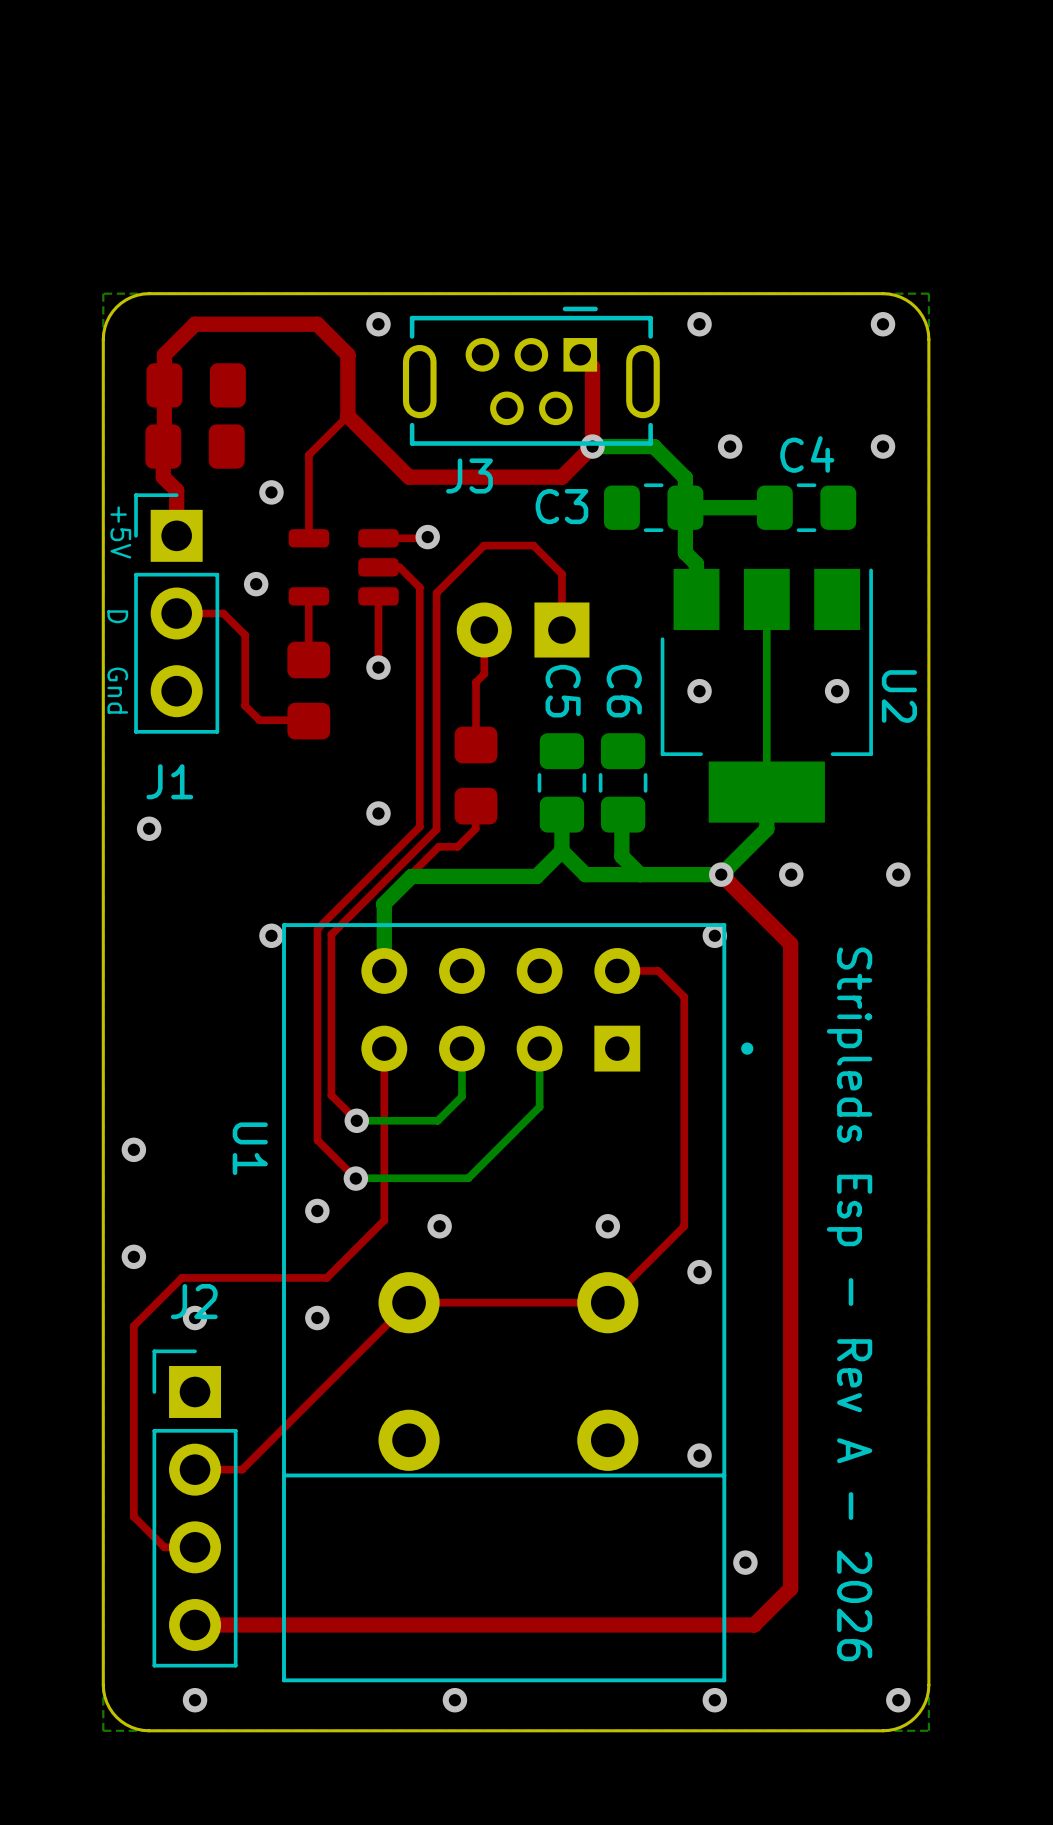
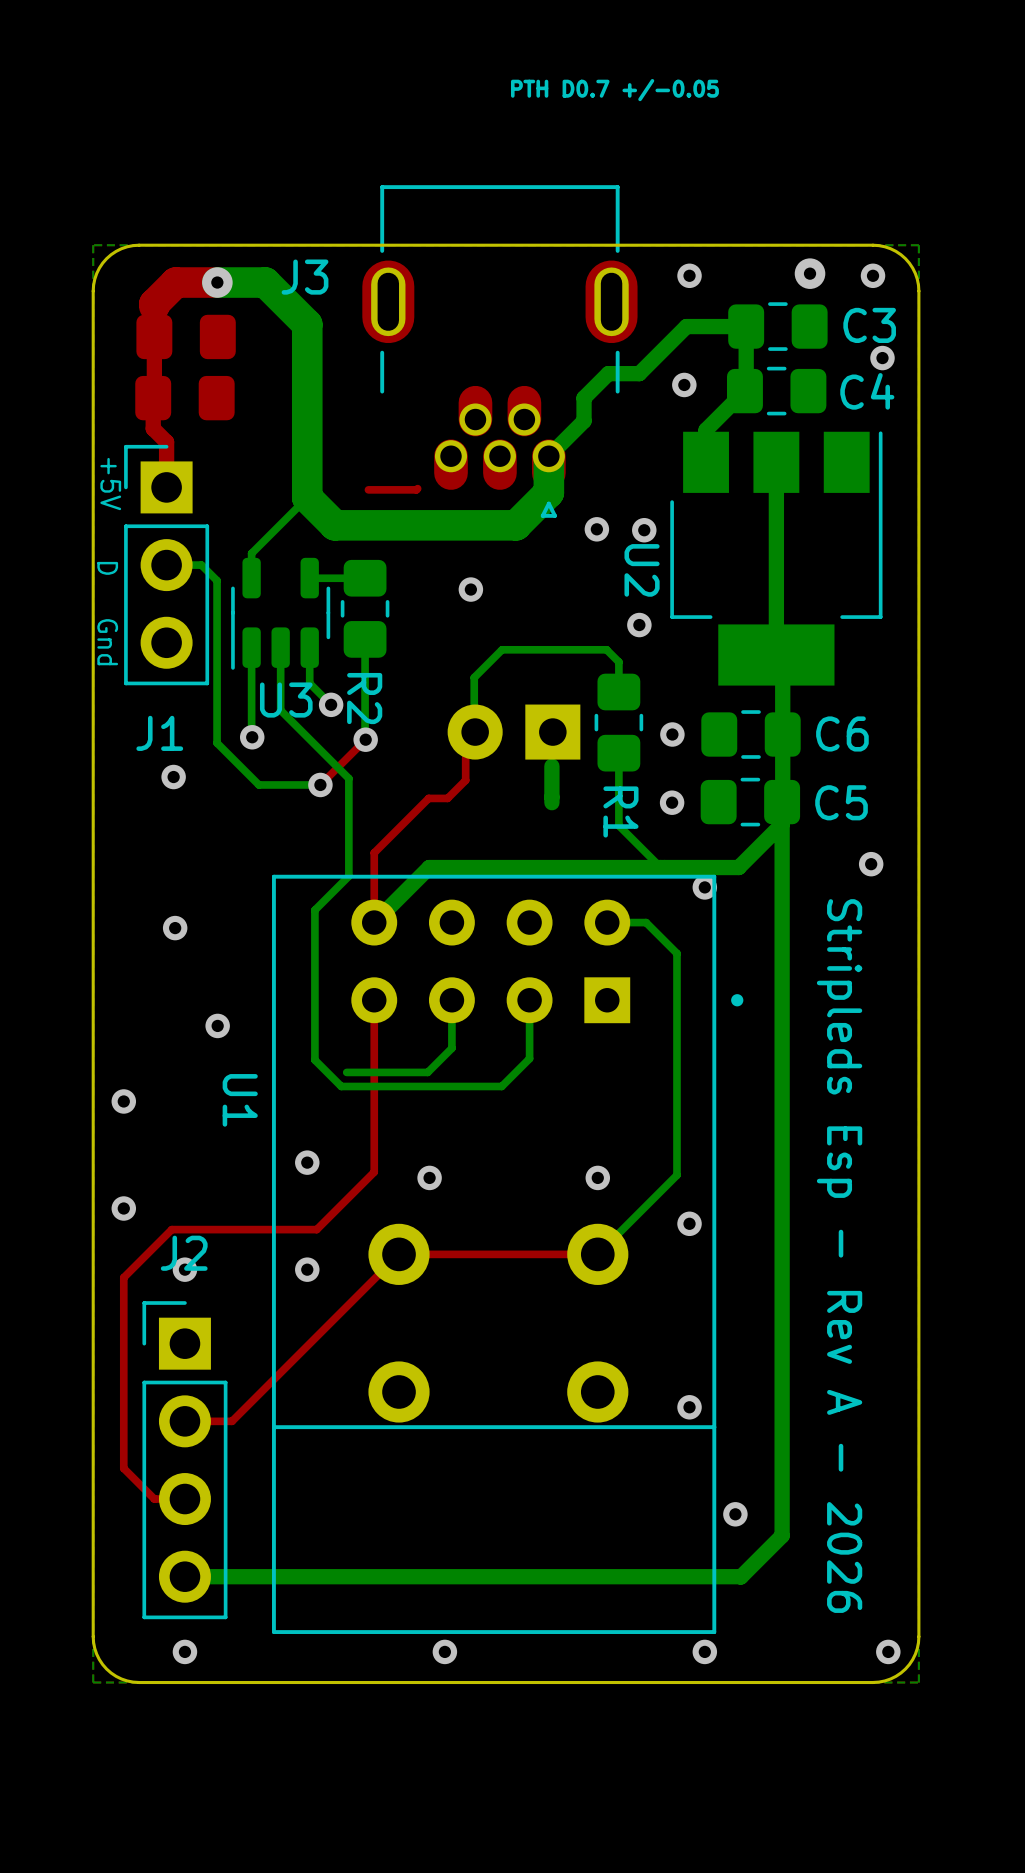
J3 footprint: [402, 306, 660, 446] -> [362, 185, 638, 518]
via: none -> (810, 273)
via: (378, 324) -> none
bottom track: none -> (217, 282) (265, 282) (307, 324) (307, 497)
via: none -> (217, 282)
top track: (164, 354) (195, 324) (317, 324) (347, 354) (347, 415) -> (154, 306) (154, 303) (175, 282) (217, 282)
top track: (580, 354) (592, 367) (592, 446) (561, 477) (409, 477) (347, 415) -> none
top track: (347, 415) (308, 454) (308, 538) -> none
bottom track: (592, 446) (653, 446) (685, 477) (685, 552) (696, 563) (696, 599) -> none
via: (592, 446) -> none
via position: (730, 446) -> (684, 384)
via position: (883, 446) -> (882, 358)
C4 name position: C4 (807, 454) -> C4 (867, 391)
J3 name position: J3 (469, 475) -> J3 (305, 277)
via: (271, 492) -> none
C3 name position: C3 (561, 506) -> C3 (869, 325)
C3 position: (653, 507) -> (777, 326)
bottom track: (774, 507) (685, 507) -> none
C4 position: (806, 507) -> (776, 391)
bottom track: none -> (706, 462) (706, 430) (746, 389) (746, 326) (686, 326) (639, 373) (608, 373) (584, 398) (584, 421) (548, 456) (548, 492) (516, 525) (334, 525) (307, 497)
bottom track: none -> (776, 462) (776, 655) (782, 661) (782, 1535) (740, 1577)
via: (427, 537) -> none
bottom track: none -> (307, 497) (251, 553) (251, 578)
U3 side: top (343, 567) -> bottom (280, 613)
top track: (378, 567) (399, 567) (419, 587) (419, 826) (317, 929) (317, 1140) (355, 1178) -> none
via: none -> (596, 529)
via: none -> (644, 530)
via: (256, 584) -> none
top track: (308, 596) (308, 659) -> none
top track: (378, 596) (378, 667) -> none
bottom track: (766, 599) (766, 829) (721, 874) (585, 874) (561, 851) (536, 876) (411, 876) (383, 904) (384, 970) -> (782, 824) (738, 867) (429, 867) (374, 922)
top track: (176, 613) (223, 613) (245, 635) (245, 705) (259, 720) (308, 721) -> none
bottom track: none -> (166, 565) (201, 565) (217, 580) (217, 743) (258, 784) (320, 784)
bottom track: none -> (365, 578) (309, 578)
top track: (484, 630) (484, 674) (476, 682) (476, 744) -> none
part position: (523, 630) -> (514, 732)
top track: (561, 630) (561, 574) (533, 545) (483, 545) (436, 593) (436, 829) (331, 934) (331, 1095) (356, 1120) -> none
via: none -> (470, 589)
via: (378, 667) -> none
via: none -> (639, 625)
bottom track: none -> (365, 639) (365, 739)
R2 side: top (308, 690) -> bottom (365, 608)
via: (699, 691) -> none
via: (837, 691) -> none
U2 position: (766, 695) -> (776, 558)
bottom track: none -> (251, 647) (252, 737)
bottom track: none -> (309, 647) (309, 683) (331, 704)
U2 name position: U2 (899, 696) -> U2 (642, 570)
bottom track: none -> (618, 692) (618, 662) (606, 649) (502, 649) (474, 677) (474, 734)
via: none -> (331, 704)
R1 side: top (476, 775) -> bottom (618, 722)
C5 rotation: 0° (561, 782) -> 90° clockwise (750, 802)
C5 position: (561, 782) -> (750, 802)
C6 rotation: 0° (623, 782) -> 90° clockwise (751, 734)
C6 position: (623, 782) -> (751, 734)
via: none -> (672, 734)
via: none -> (252, 737)
top track: none -> (365, 739) (320, 784)
bottom track: none -> (618, 753) (618, 825) (660, 867)
via position: (378, 813) -> (365, 739)
bottom track: (623, 814) (621, 856) (640, 874) -> none
via position: (149, 828) -> (173, 777)
via: none -> (320, 784)
top track: (721, 874) (790, 944) (790, 1588) (754, 1624) (195, 1624) -> none
via position: (721, 874) -> (672, 802)
via: (791, 874) -> none
via position: (898, 874) -> (871, 864)
via: (271, 935) -> none
top track: (617, 970) (658, 970) (684, 996) (684, 1226) (607, 1302) -> none
bottom track: none -> (607, 922) (646, 922) (676, 953) (676, 1175) (597, 1254)
via: none -> (175, 928)
via: none -> (217, 1025)
via: (356, 1120) -> none
bottom track: (511, 1134) (468, 1178) (356, 1178) -> (501, 1086) (341, 1086) (314, 1060) (314, 910) (348, 876) (348, 778) (280, 710) (280, 647)
via: (355, 1178) -> none
bottom track: none -> (740, 1576) (184, 1576)

